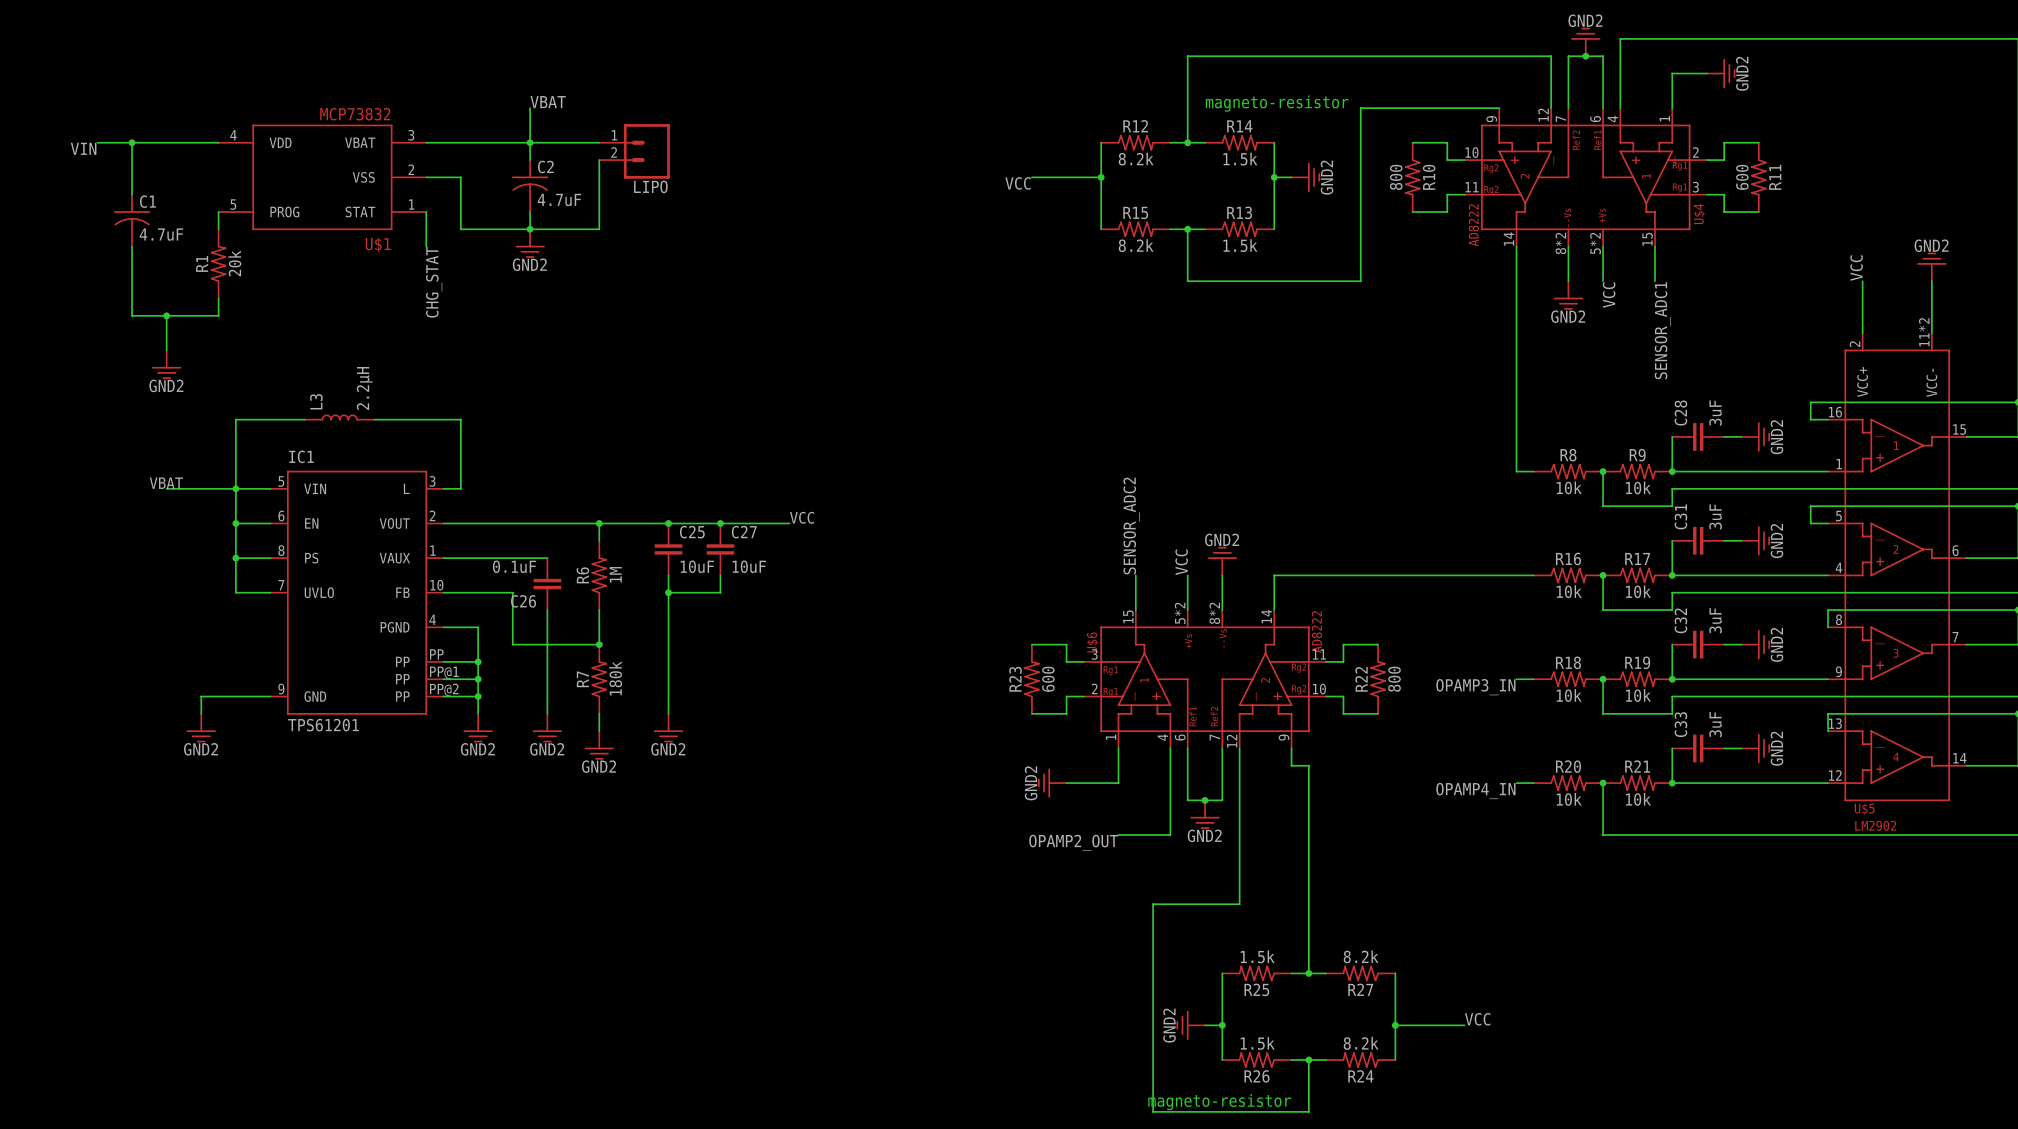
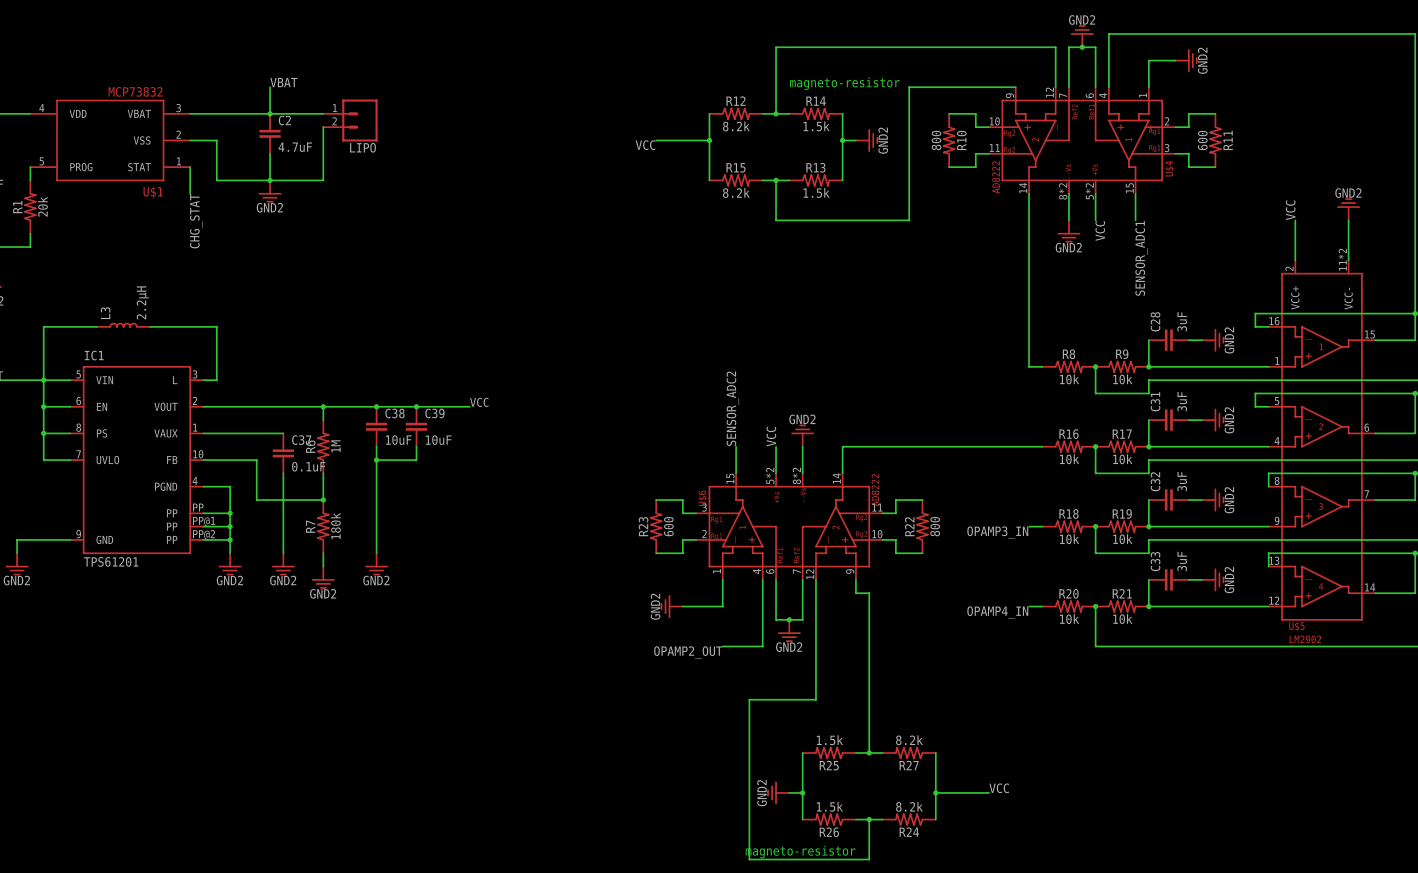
C2 symbol: [511, 160, 549, 212] -> [259, 113, 281, 154]
C25 name: C25 (692, 532) -> C38 (394, 413)
C27 name: C27 (744, 532) -> C39 (434, 413)
C26 value position: 0.1uF (514, 566) -> 0.1uF (308, 466)
C26 name: C26 (523, 601) -> C37 (301, 440)

